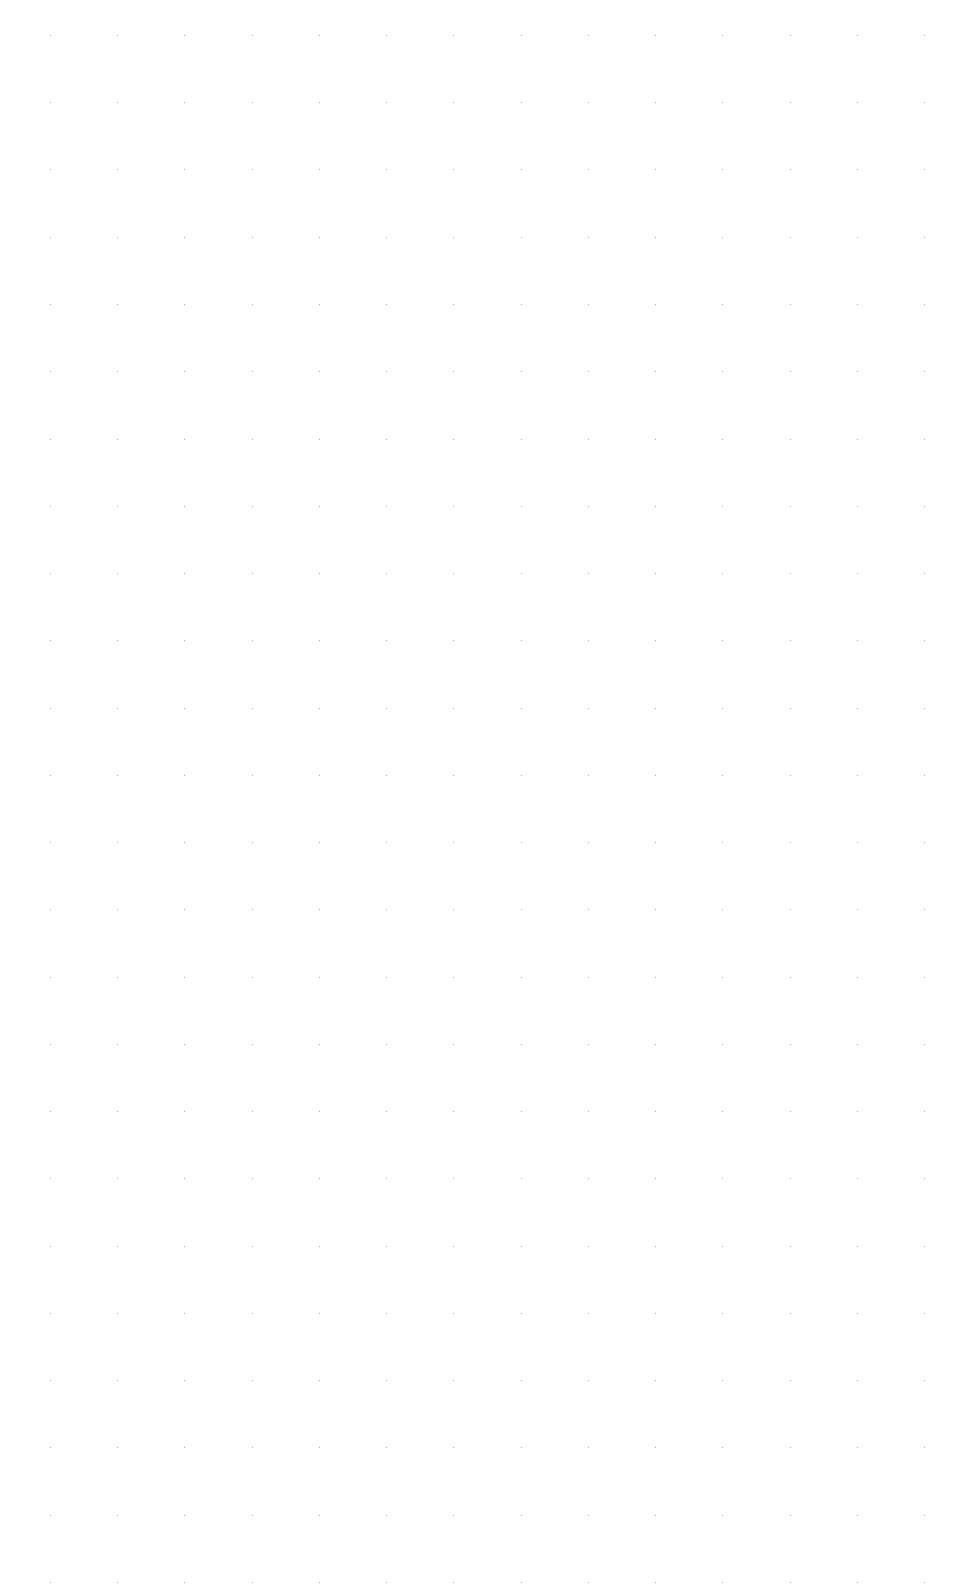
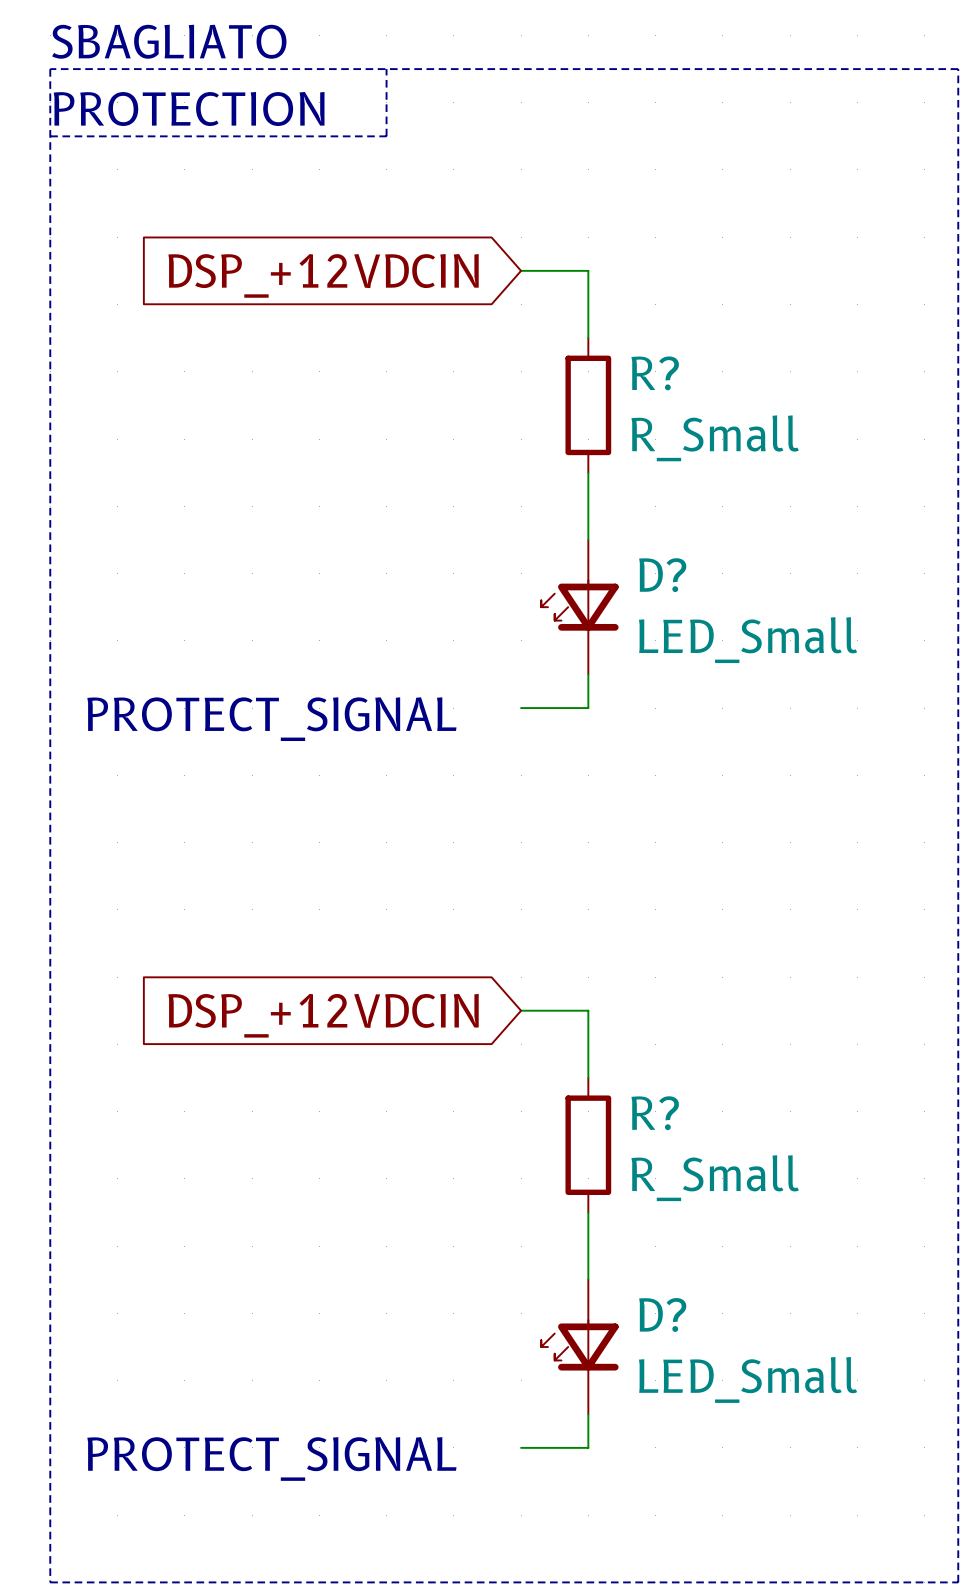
text: none -> SBAGLIATO (169, 41)
line: none -> (50, 69) (50, 1582) (958, 1582) (958, 69) (50, 69)
line: none -> (386, 69) (386, 136) (50, 136)
text: none -> PROTECTION (189, 108)
wire: none -> (521, 270) (588, 270) (588, 338)
global label: none -> DSP_+12VDCIN (323, 275)
R?: none -> R_Small (588, 405)
wire: none -> (588, 472) (588, 539)
D?: none -> LED_Small (579, 607)
wire: none -> (588, 674) (588, 708) (521, 708)
text: none -> PROTECT_SIGNAL (271, 719)
wire: none -> (521, 1010) (588, 1010) (588, 1077)
global label: none -> DSP_+12VDCIN (323, 1015)
R?: none -> R_Small (588, 1145)
wire: none -> (588, 1212) (588, 1279)
D?: none -> LED_Small (579, 1347)
wire: none -> (588, 1414) (588, 1447) (521, 1447)
text: none -> PROTECT_SIGNAL (271, 1459)

